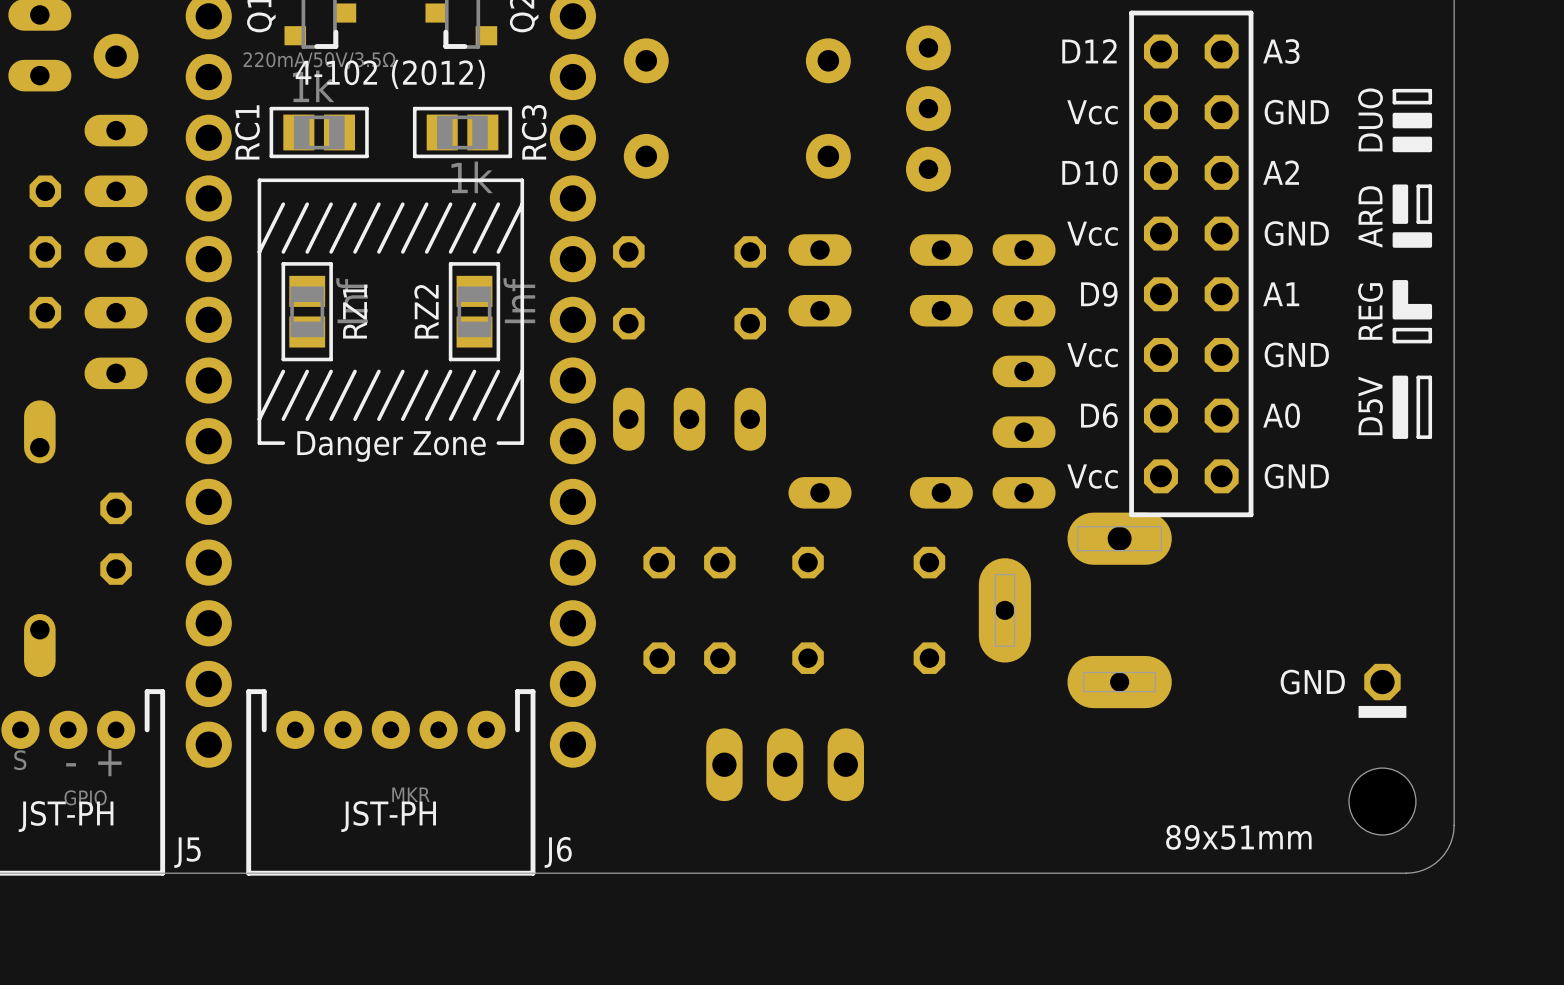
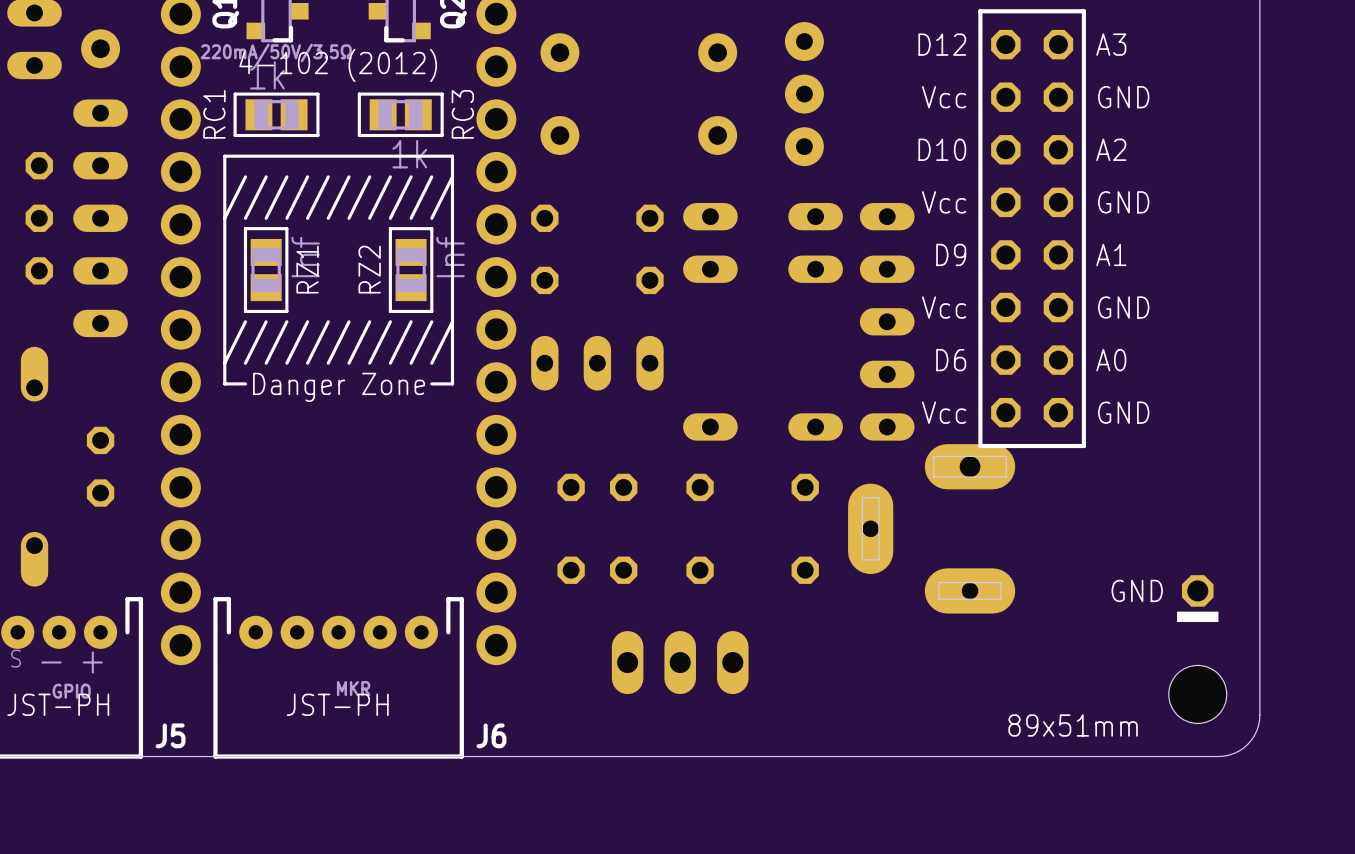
line: (1430, 90) (1394, 90) (1394, 102) (1430, 102) (1430, 90) -> none
drawing: [1392, 112, 1433, 153] -> none
text: DUO (1370, 119) -> none
drawing: [1392, 184, 1433, 248] -> none
line: (1430, 186) (1430, 222) (1418, 222) (1418, 186) (1430, 186) -> none
text: ARD (1370, 216) -> none
drawing: [1392, 280, 1433, 320] -> none
text: REG (1370, 311) -> none
line: (1430, 329) (1430, 341) (1394, 341) (1394, 329) (1430, 329) -> none
drawing: [1392, 375, 1409, 439] -> none
line: (1430, 377) (1430, 437) (1418, 437) (1418, 377) (1430, 377) -> none
text: D5V (1370, 405) -> none

